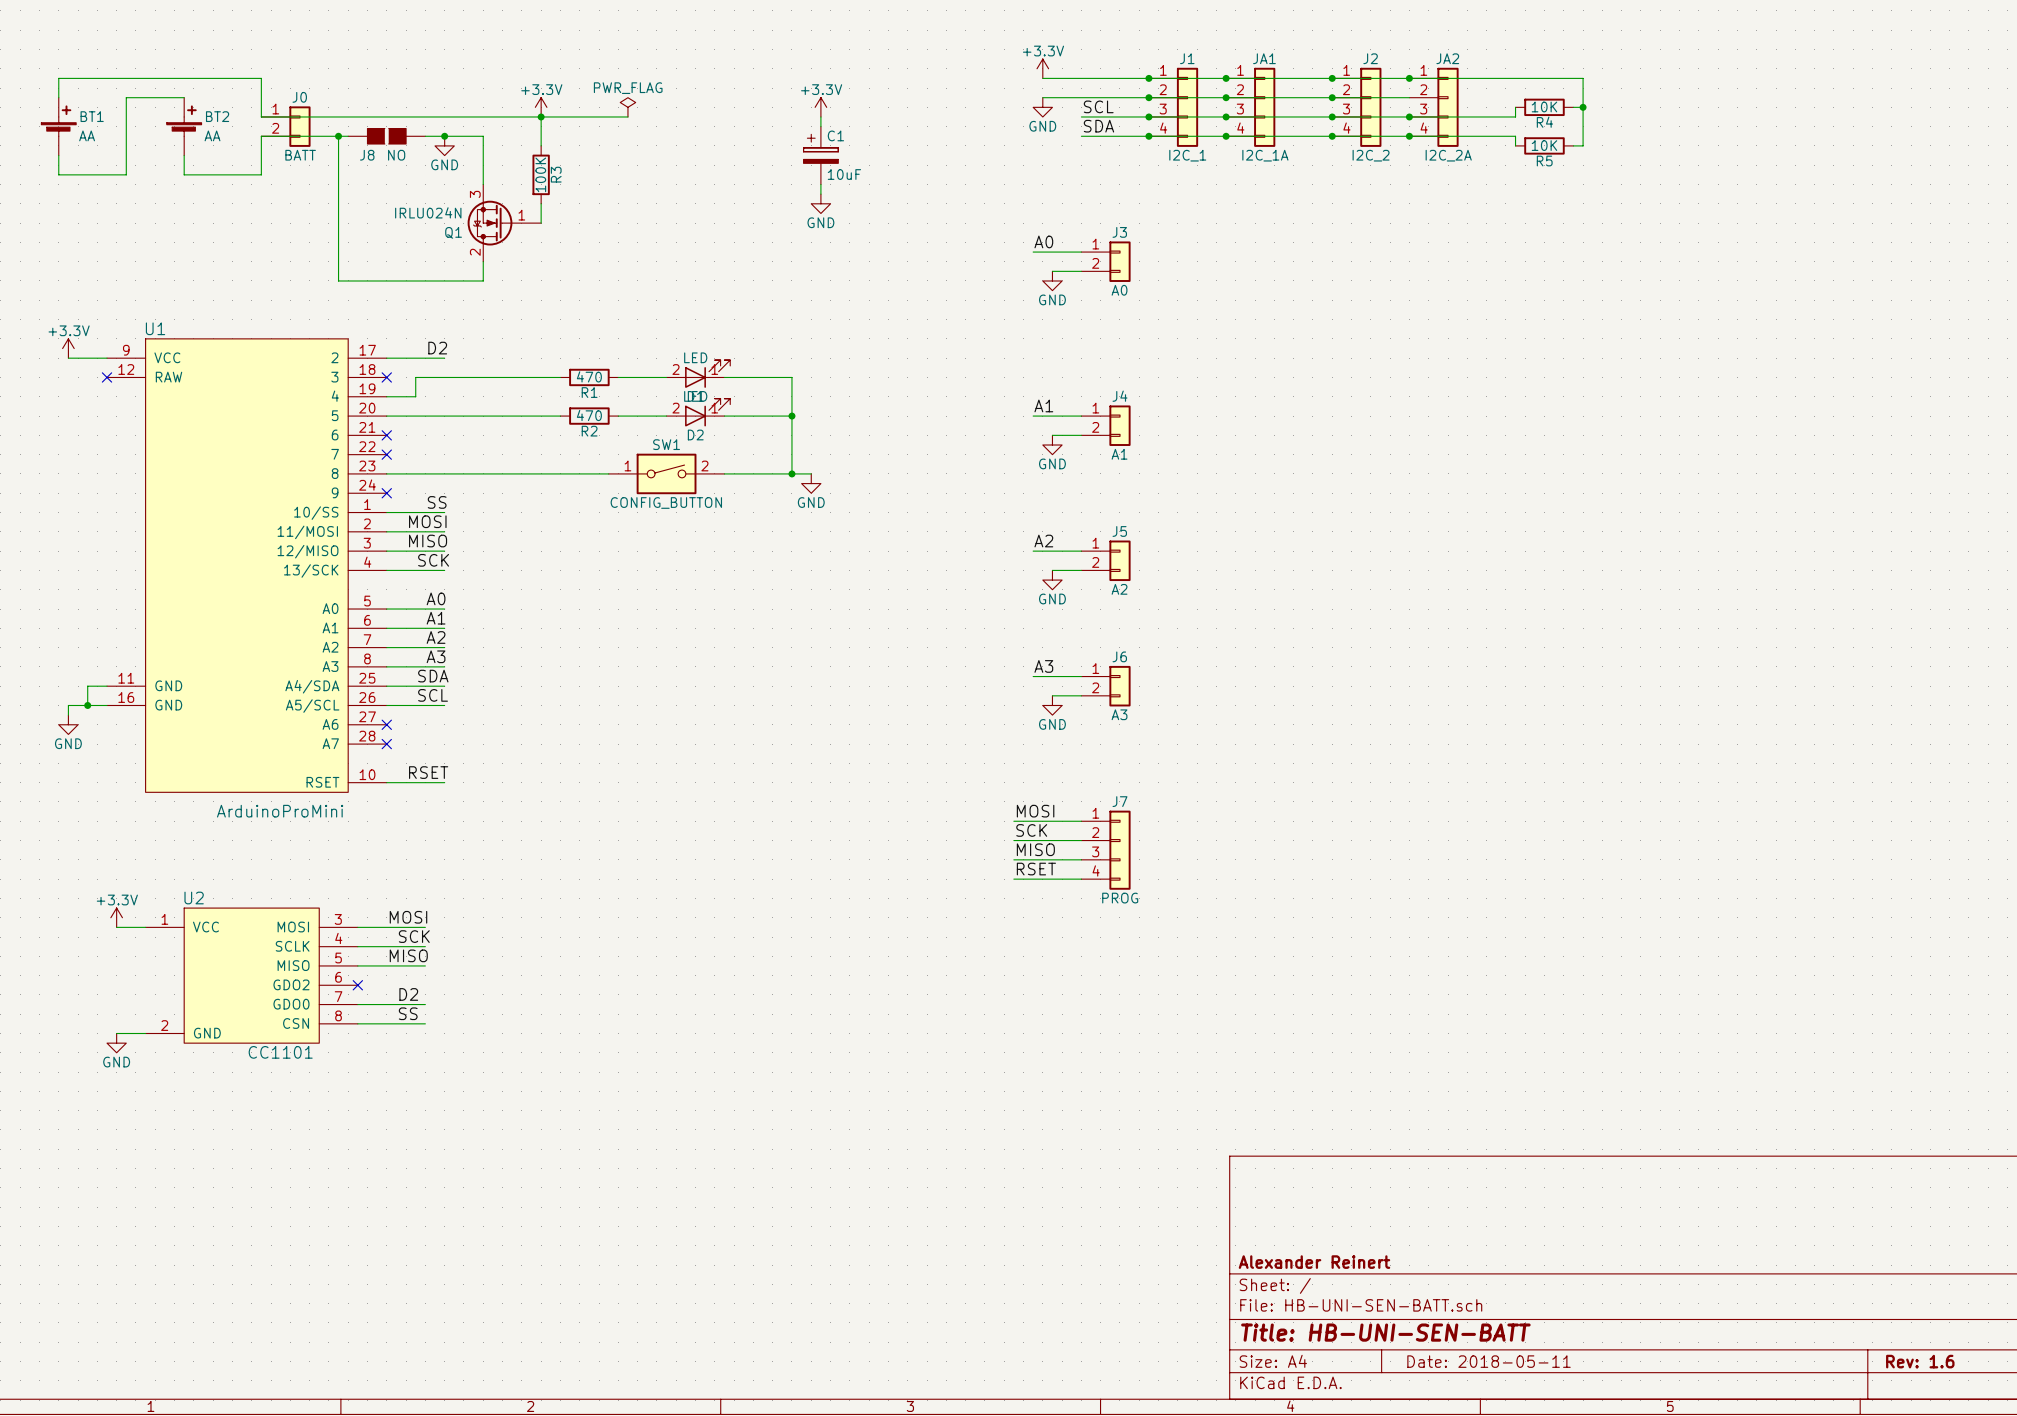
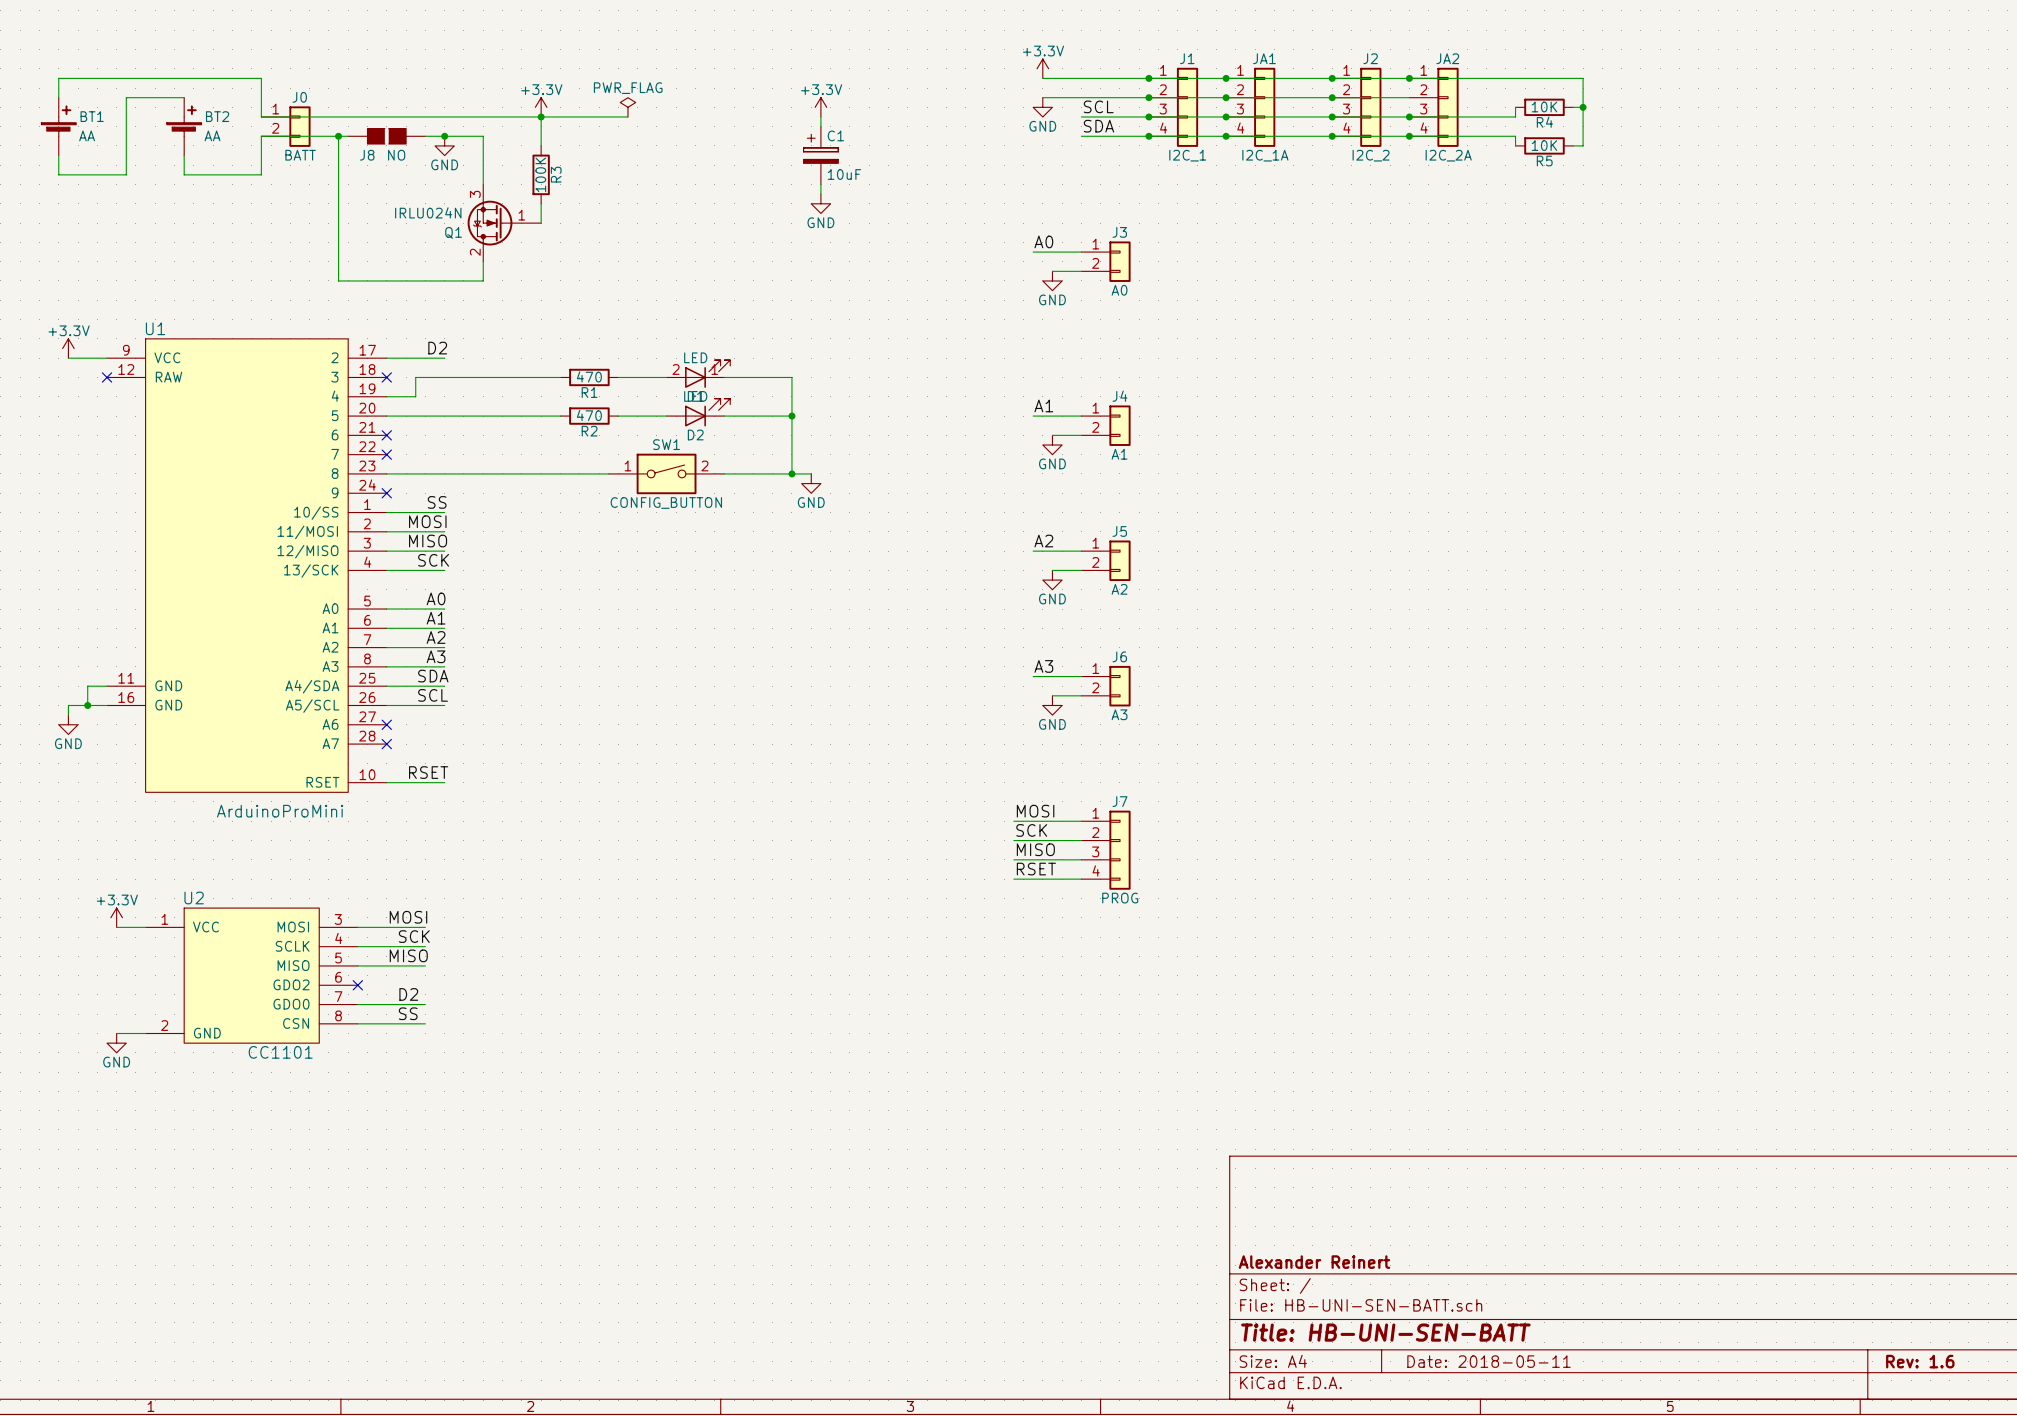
D2 pin number: 2 (675, 408) -> none
D2 pin number: 1 (714, 408) -> none

